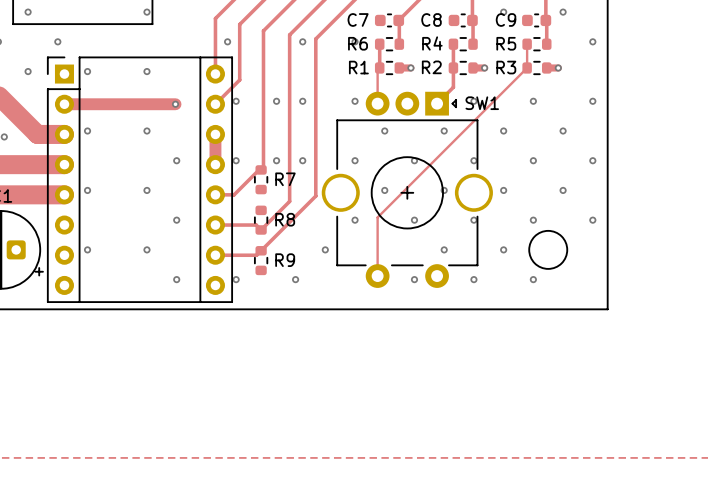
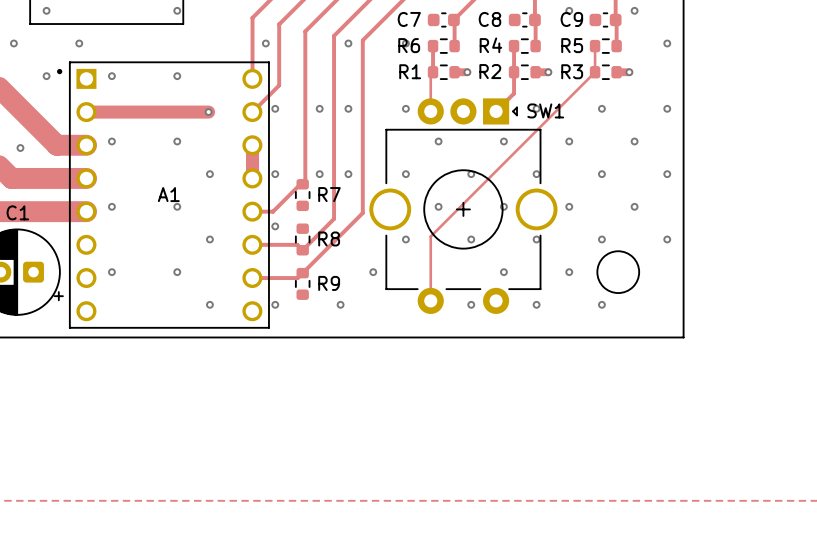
A1: none -> (163, 195)
part: (139, 179) -> none
via: none -> (275, 226)

